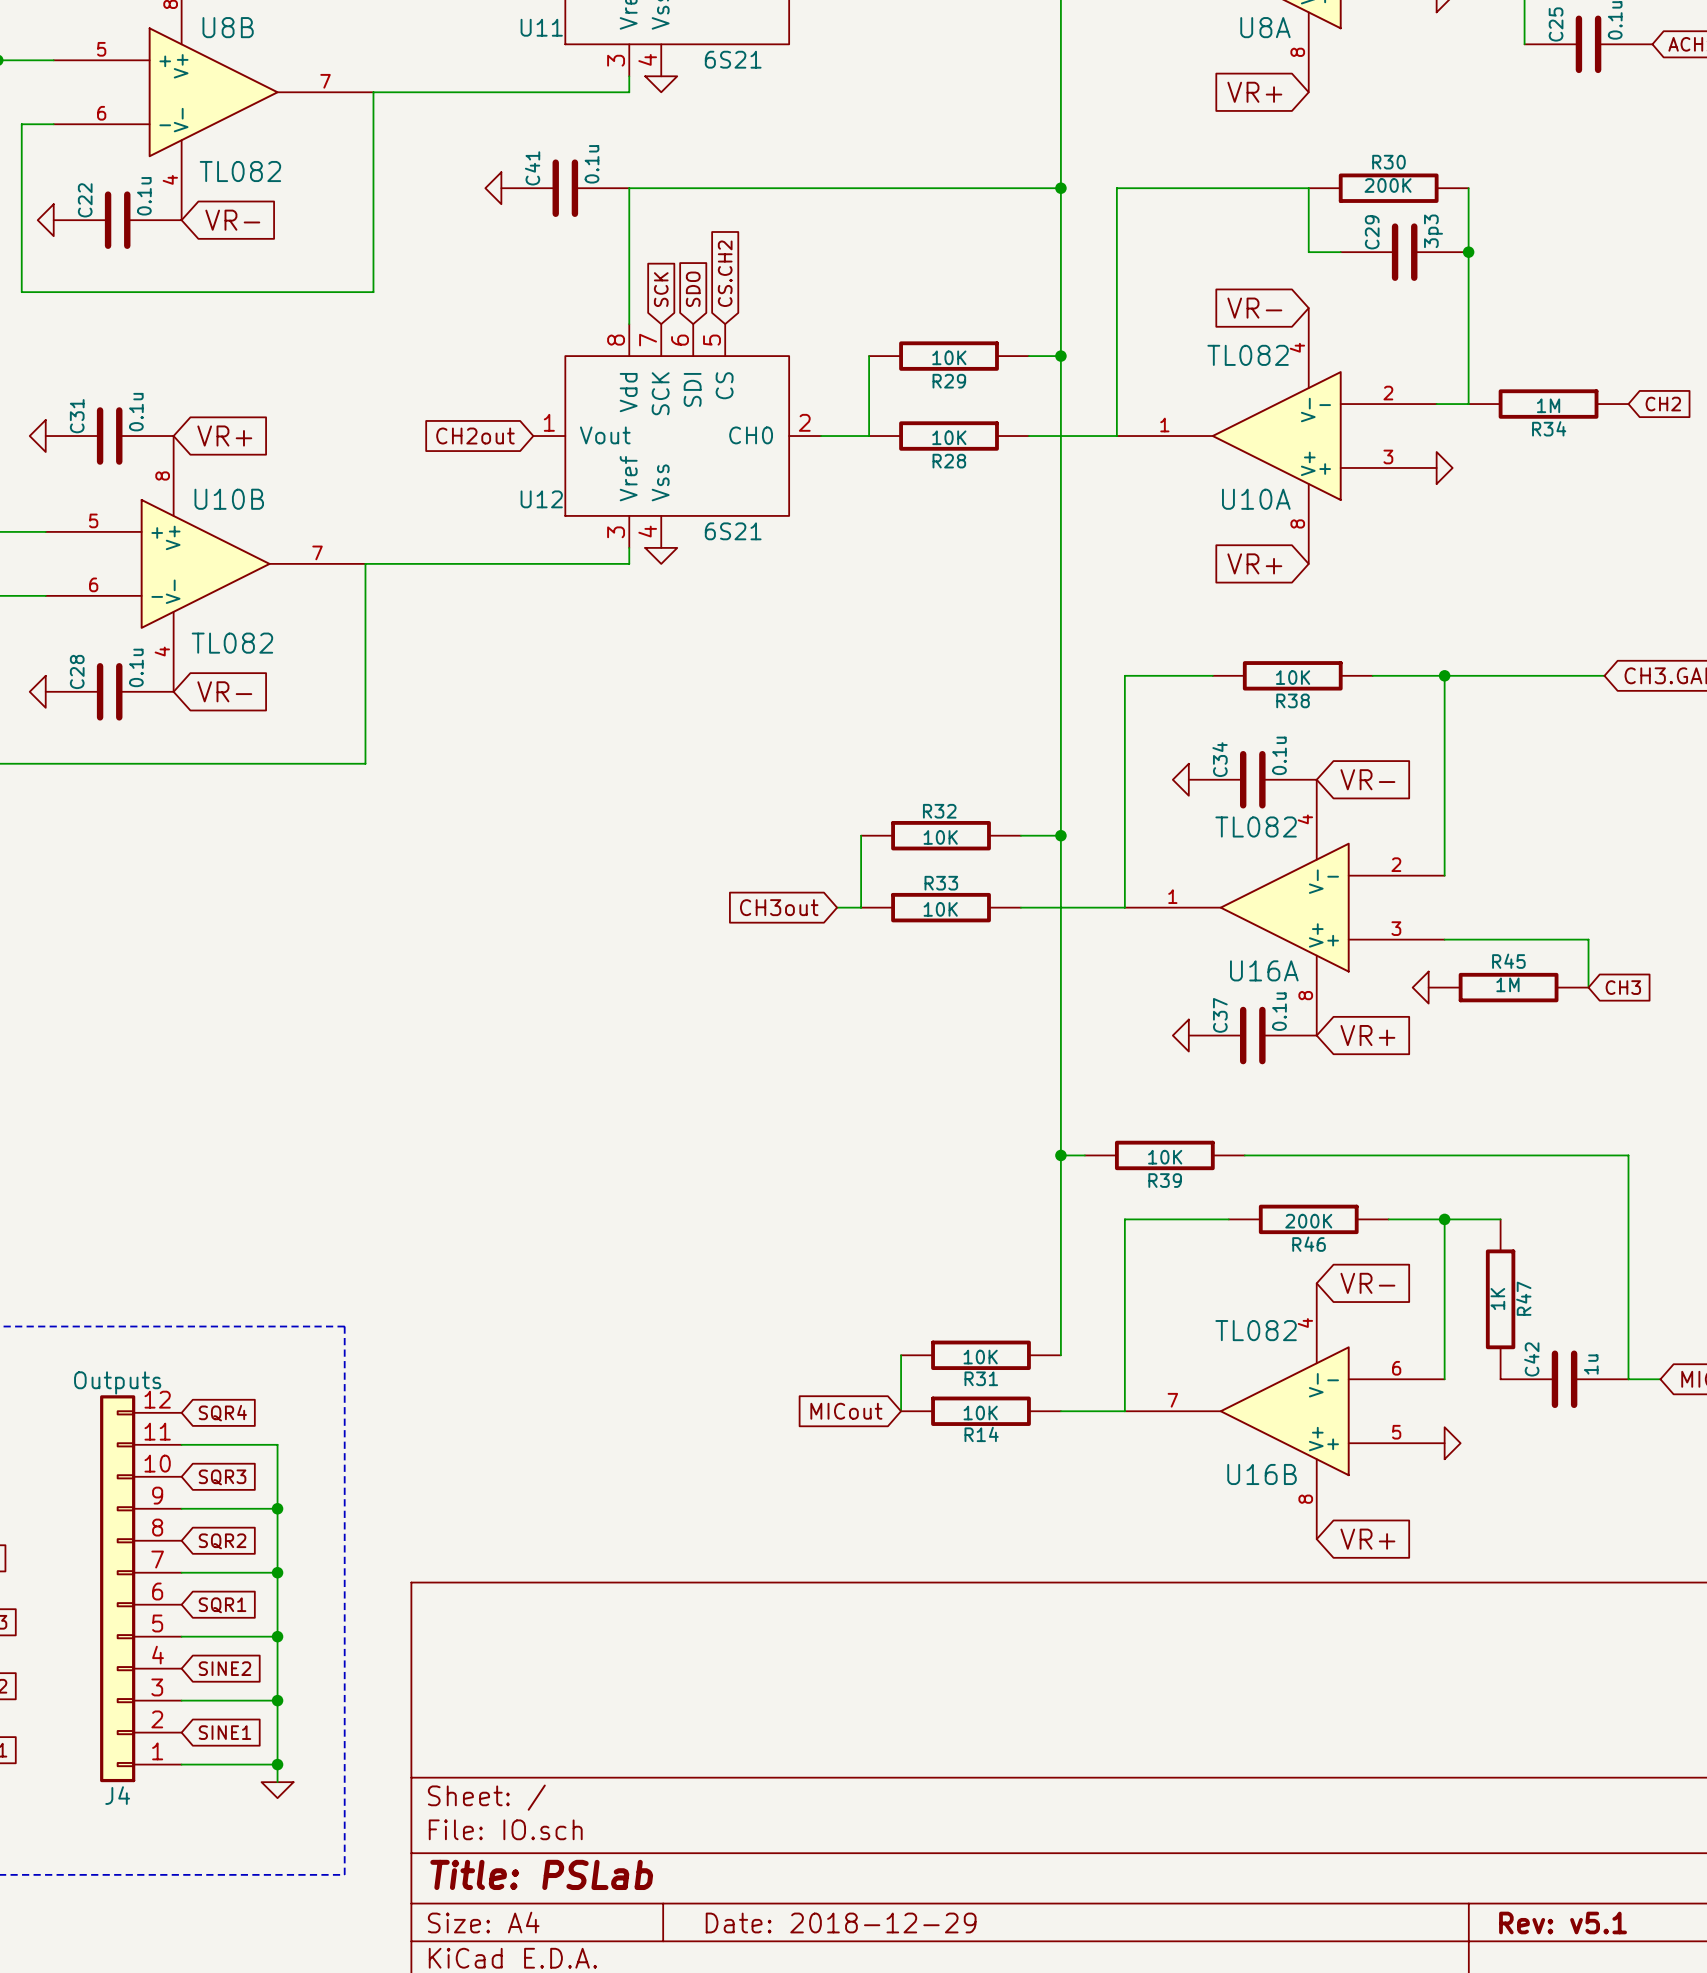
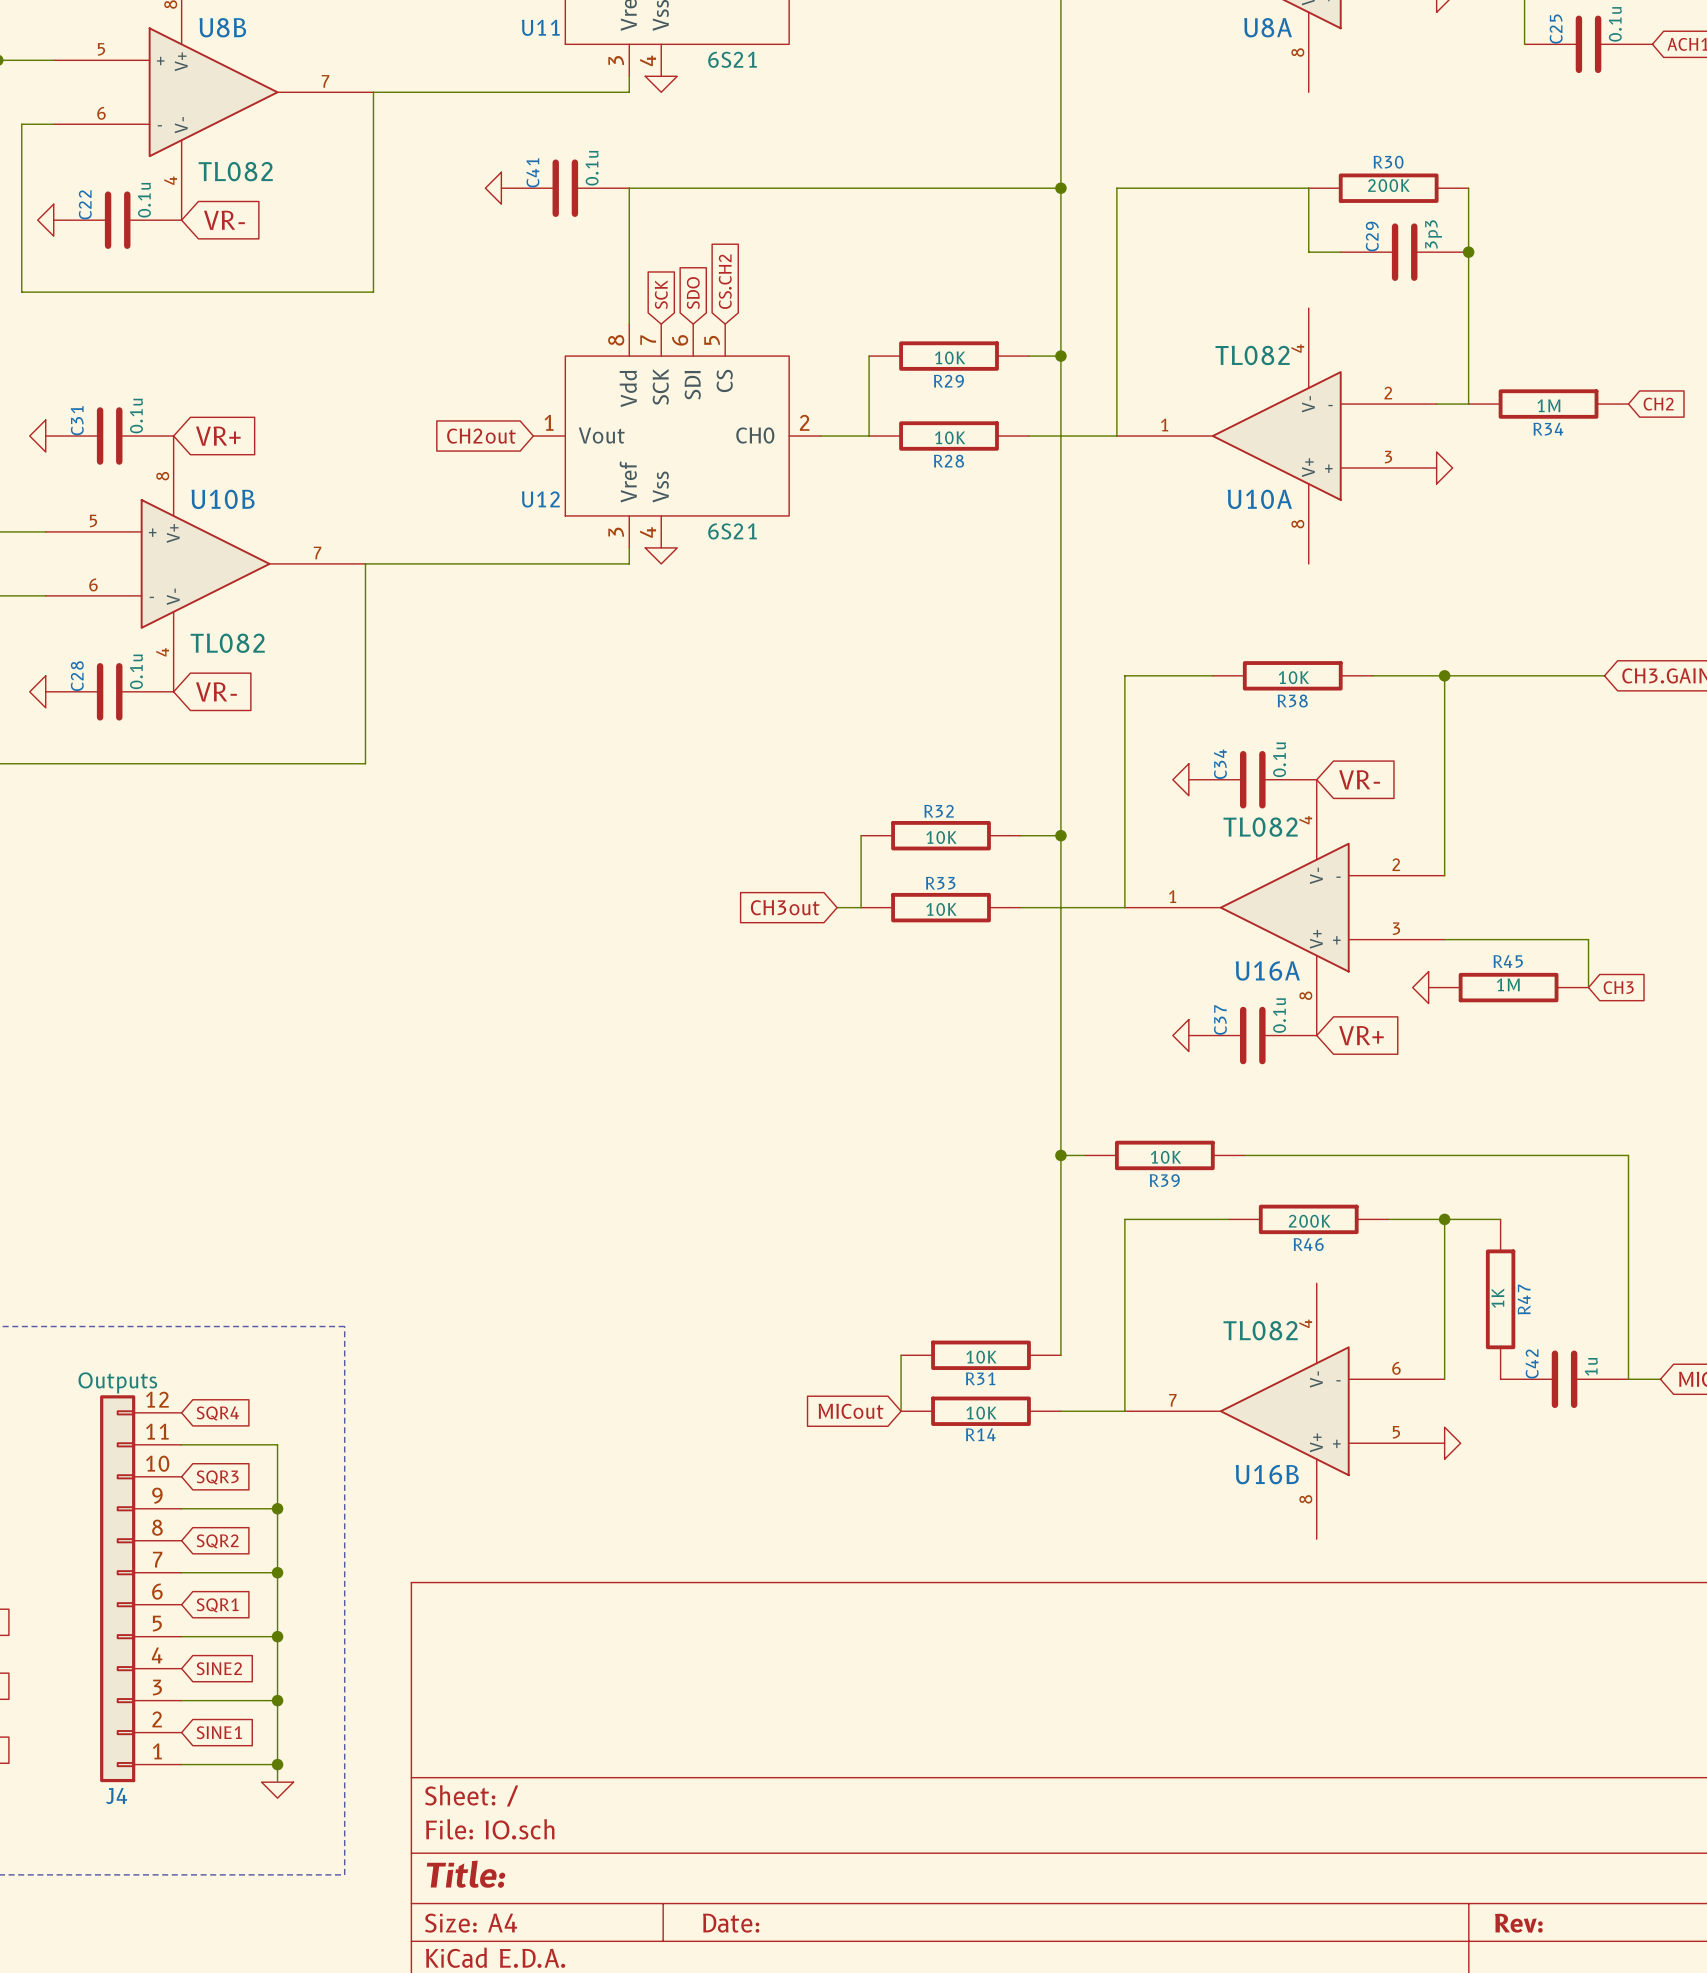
global label: VR+ (1254, 92) -> none
global label: VR- (1254, 308) -> none
global label: VR+ (1254, 563) -> none
global label: VR- (1367, 1283) -> none
global label: VR+ (1367, 1539) -> none
title block: Title: PSLab (541, 1874) -> Title: (466, 1874)
title block: Date: 2018-12-29 (841, 1922) -> Date: (731, 1923)
title block: Rev: v5.1 (1563, 1922) -> Rev: (1518, 1923)

